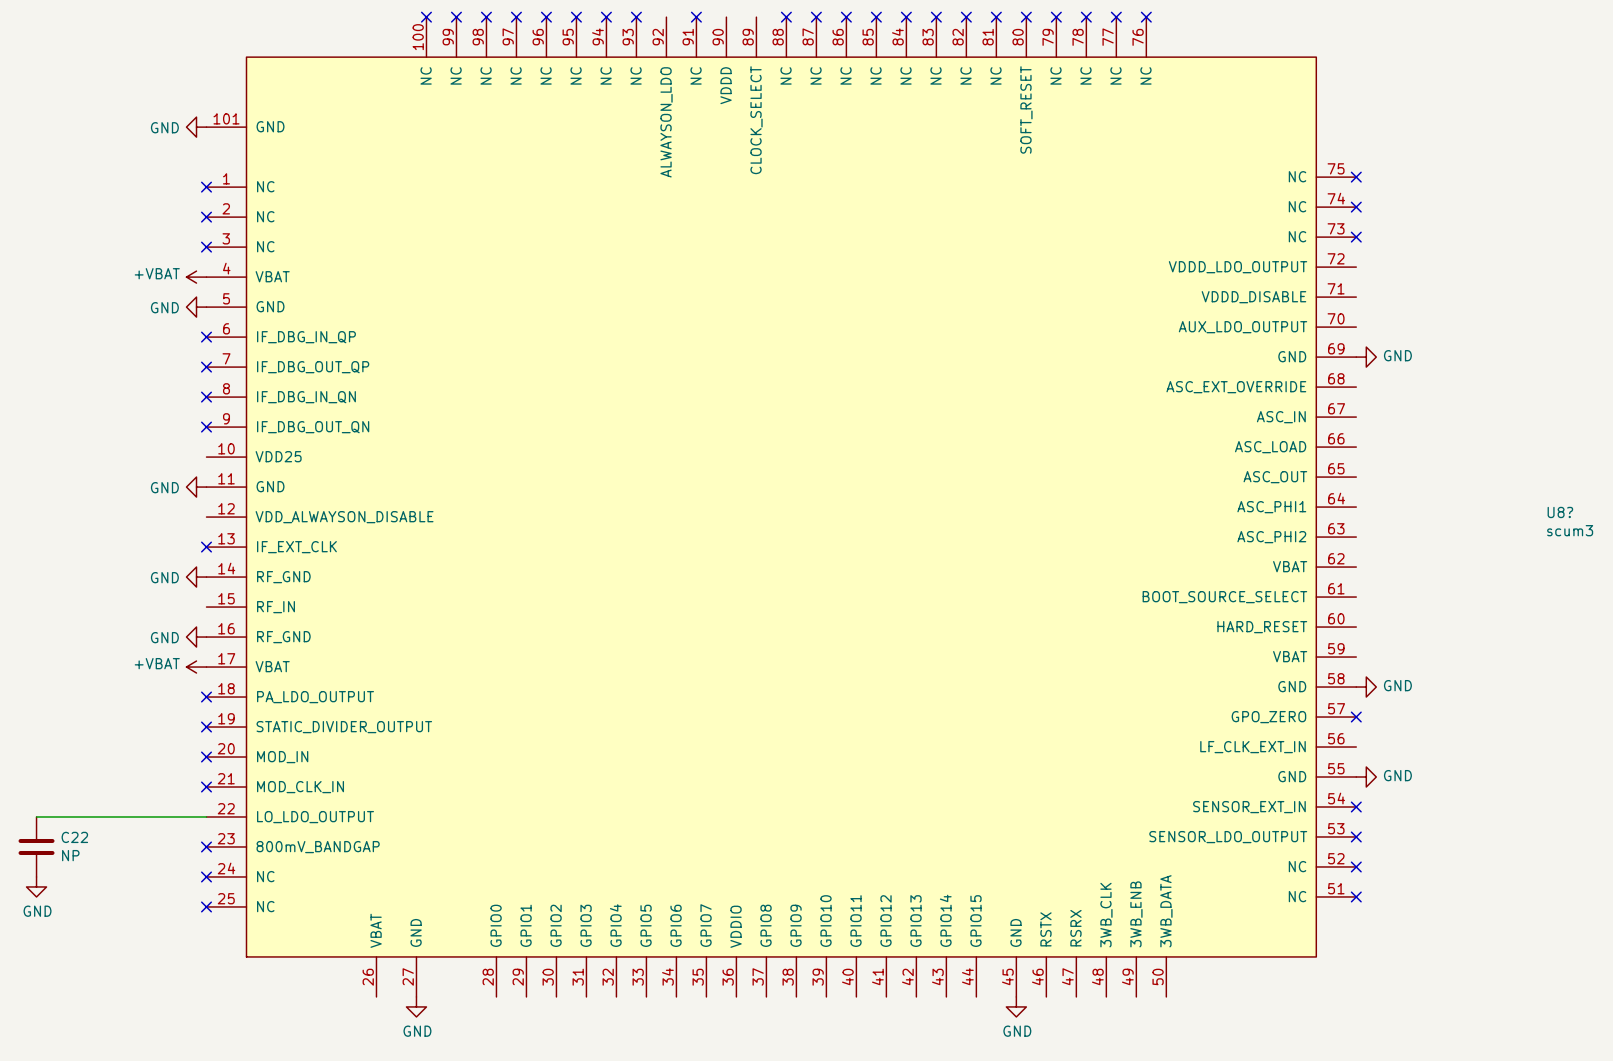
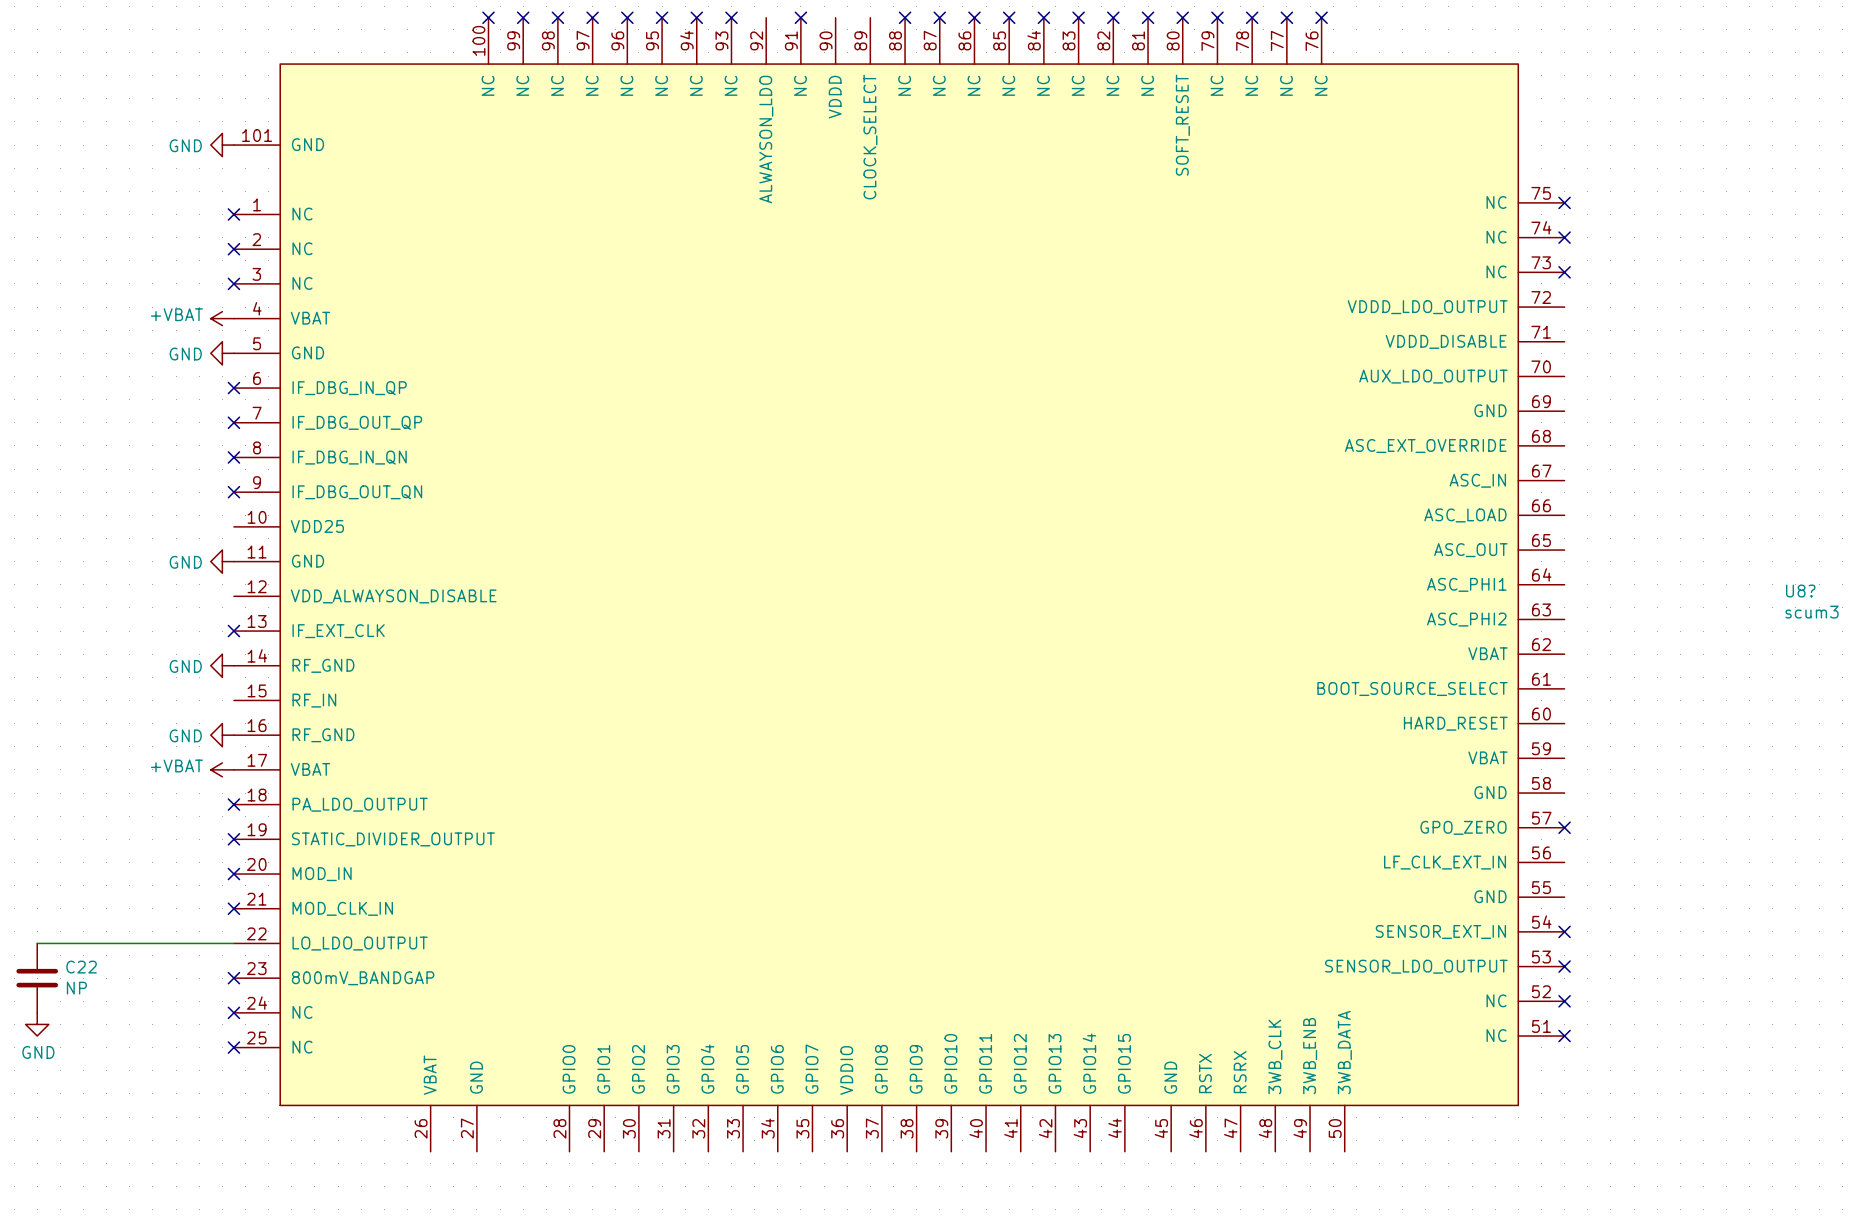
power symbol: GND (1366, 357) -> none
power symbol: GND (1366, 687) -> none
power symbol: GND (1366, 777) -> none
power symbol: GND (416, 1006) -> none
power symbol: GND (1016, 1006) -> none

